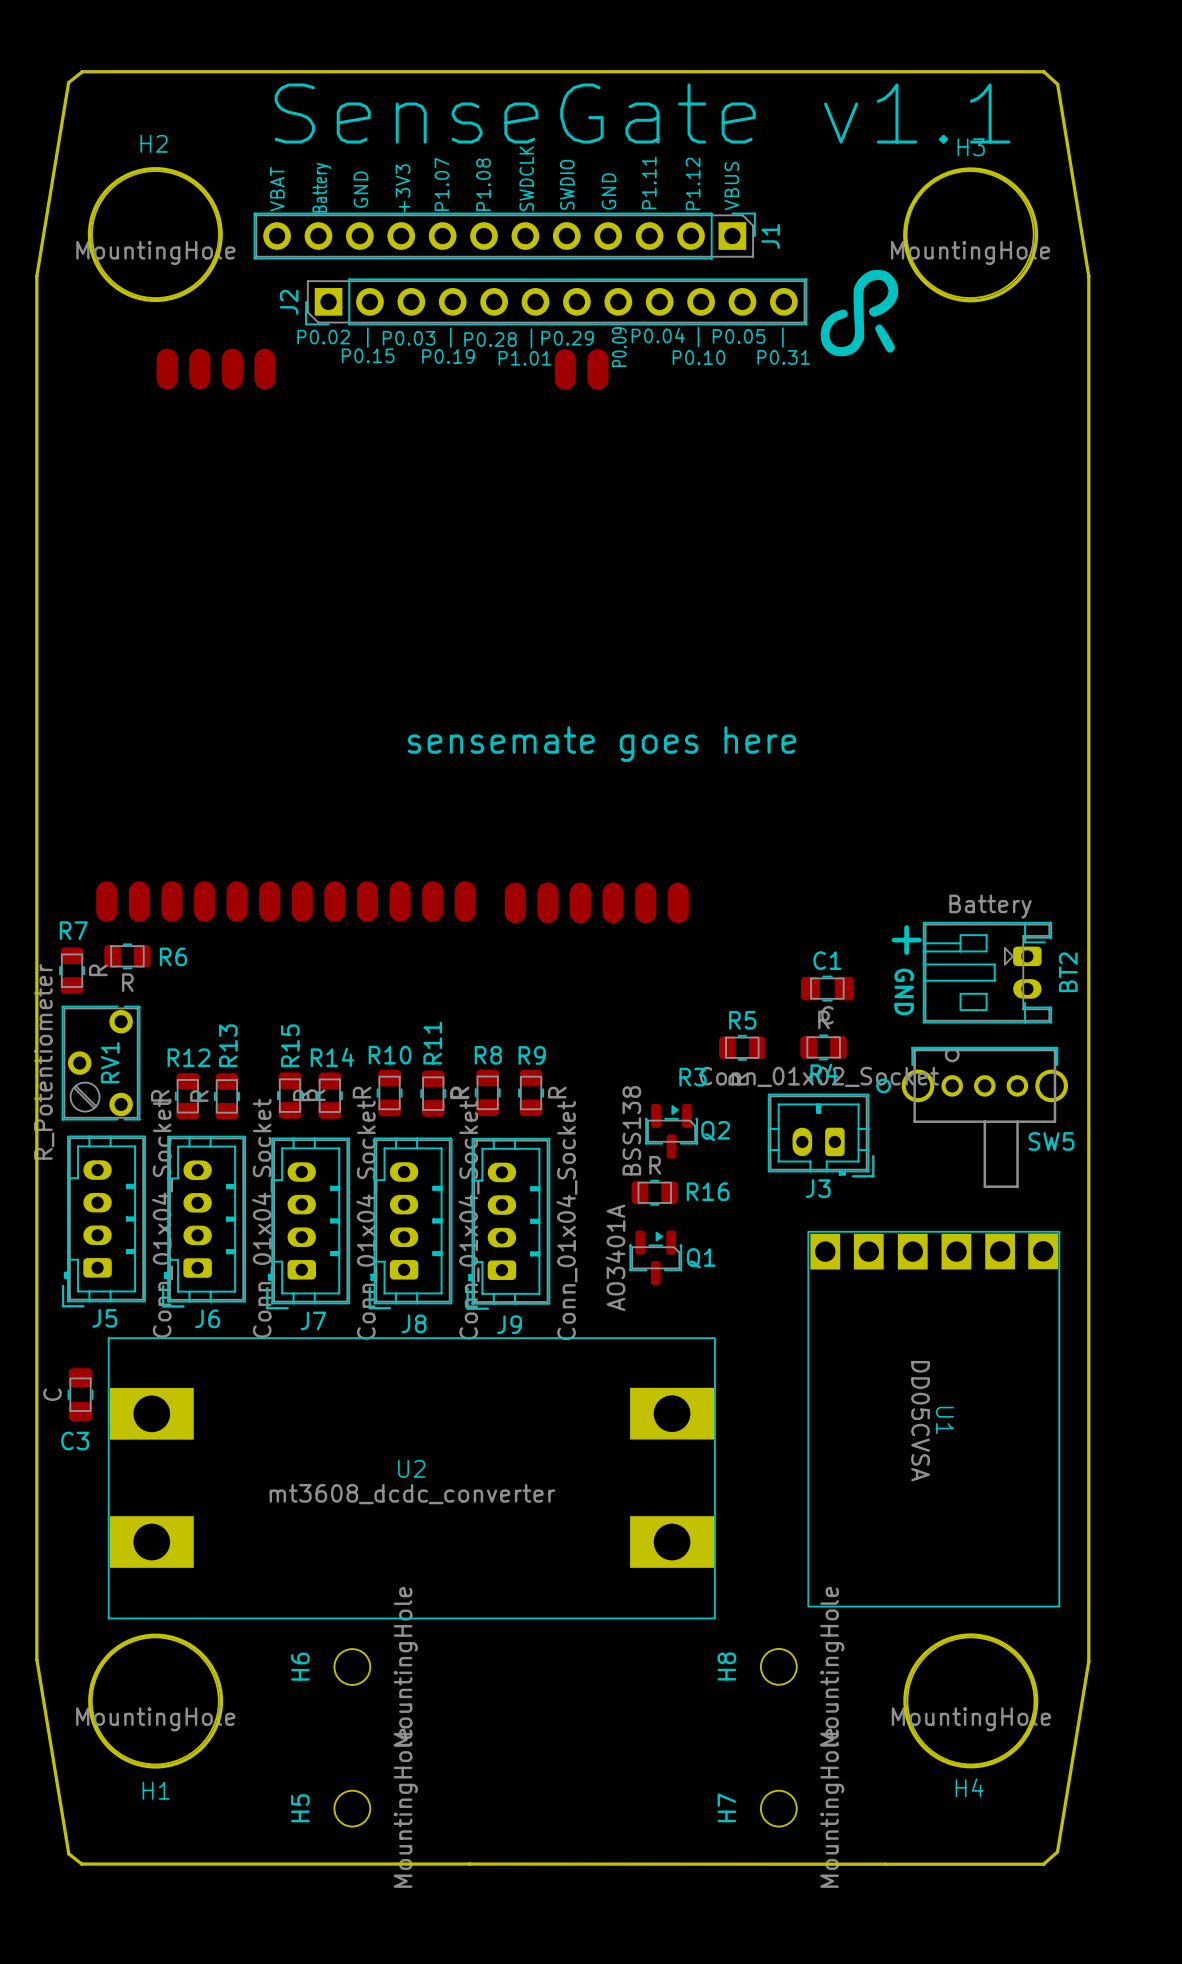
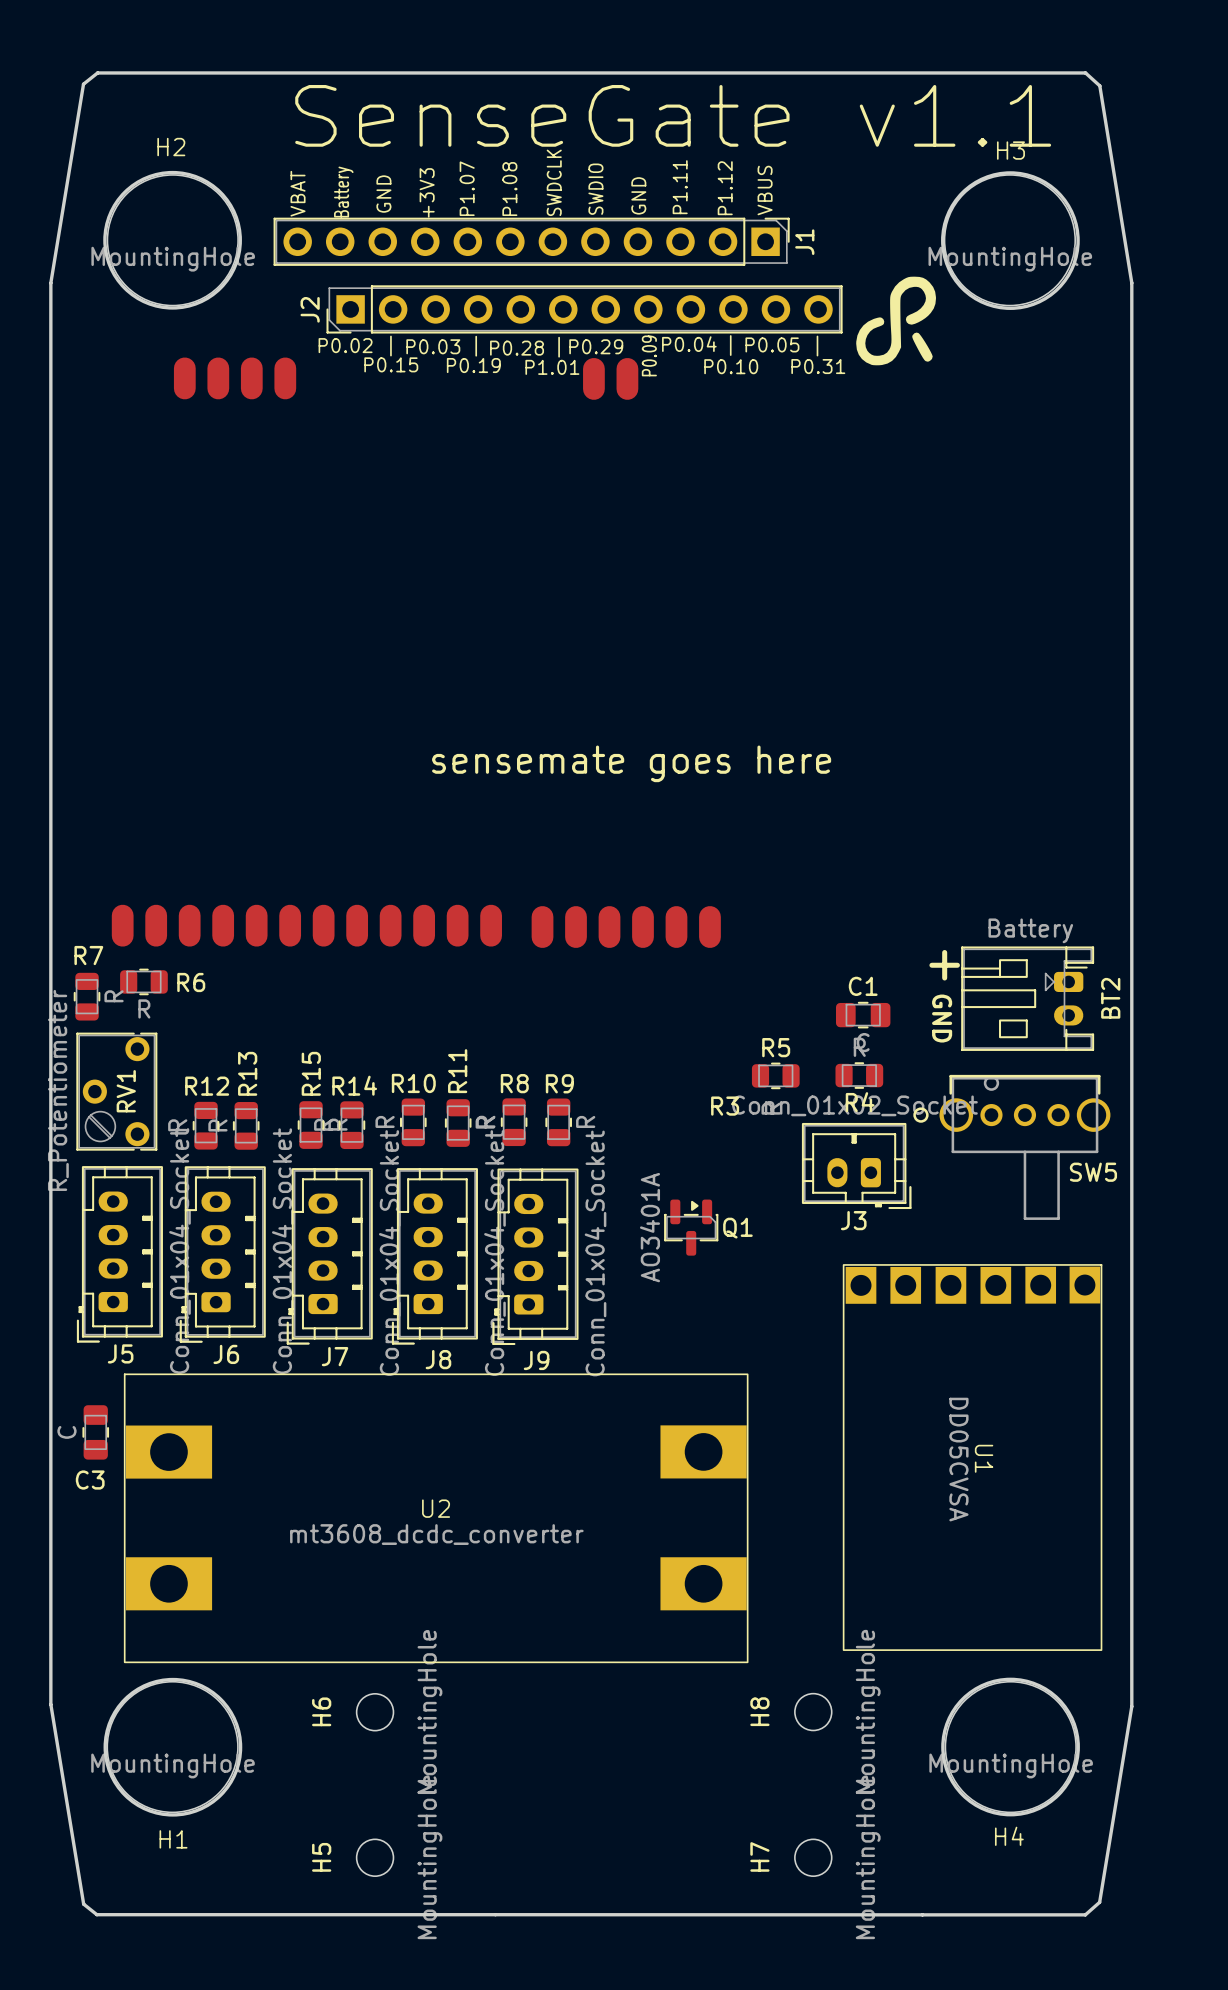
Q2: BSS138 (671, 1131) -> none
R16: R (654, 1192) -> none
Q1 position: (655, 1257) -> (691, 1227)

